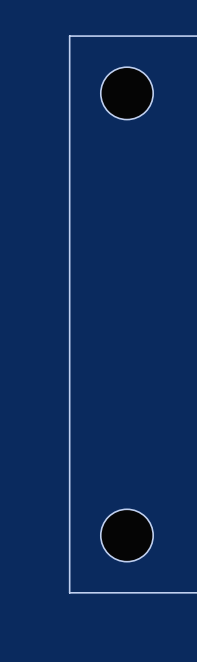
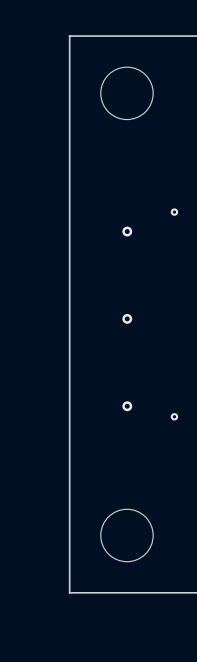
via: none -> (174, 212)
via: none -> (127, 231)
via: none -> (127, 318)
via: none -> (127, 406)
via: none -> (174, 416)

